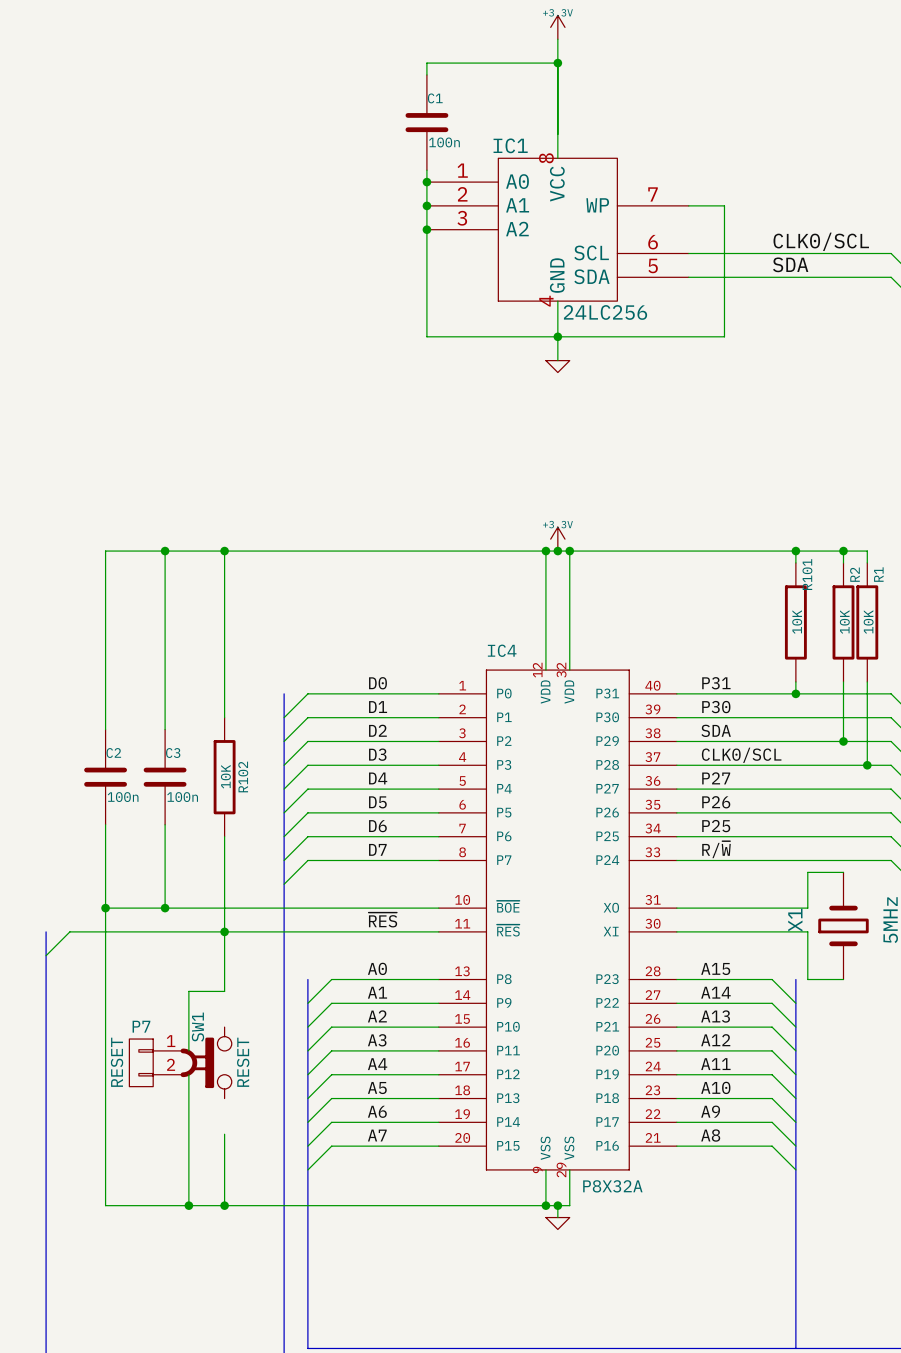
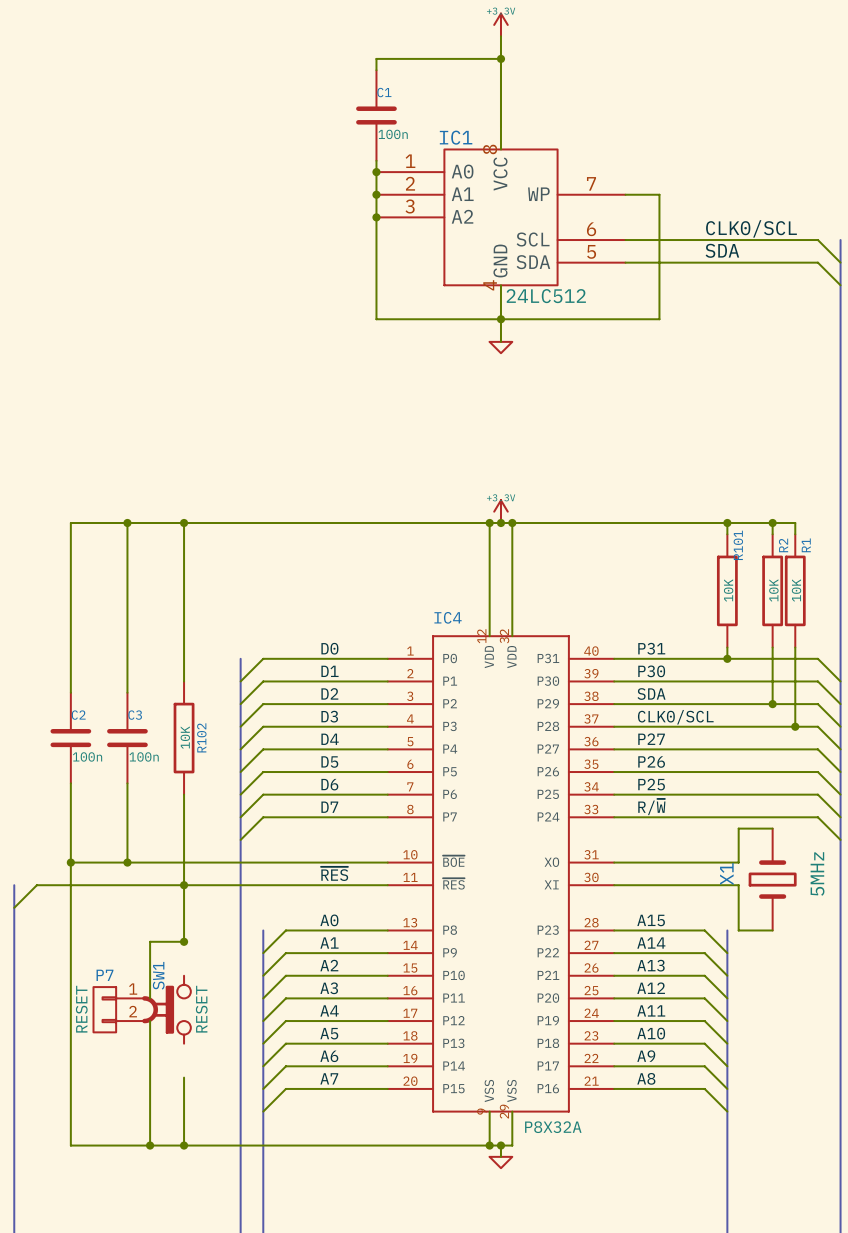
IC1 value: 24LC256 (605, 312) -> 24LC512 (546, 296)
junction: none -> (184, 941)

